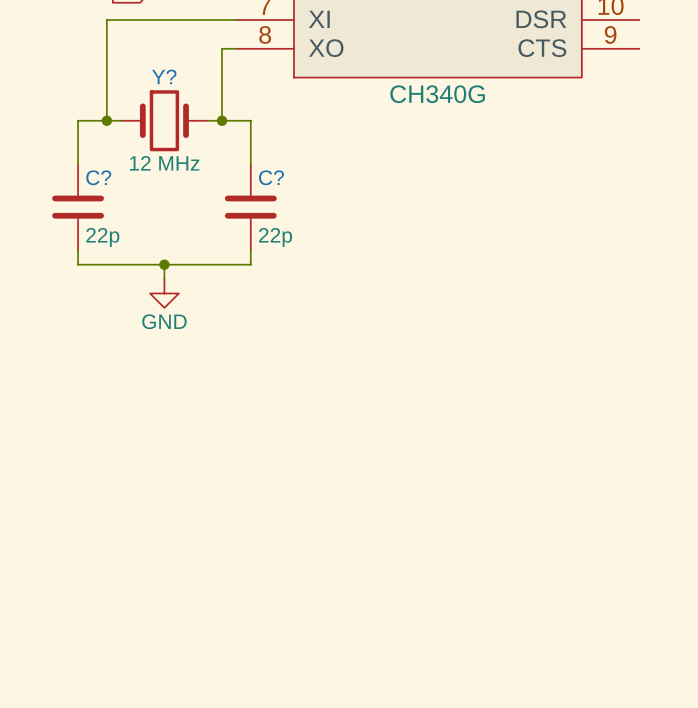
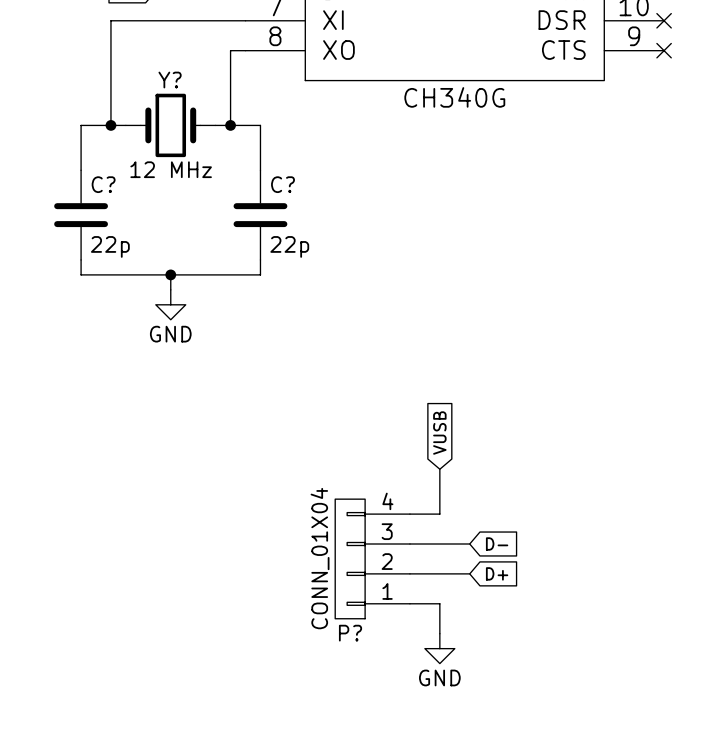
no-connect mark: none -> (664, 20)
no-connect mark: none -> (664, 50)
global label: none -> VUSB (439, 433)
wire: none -> (439, 469) (439, 514) (409, 514)
wire: none -> (409, 543) (469, 543)
global label: none -> D- (497, 543)
P?: none -> CONN_01X04 (372, 558)
wire: none -> (409, 573) (469, 573)
global label: none -> D+ (497, 573)
wire: none -> (409, 603) (439, 603) (439, 633)
power symbol: none -> GND (439, 648)

